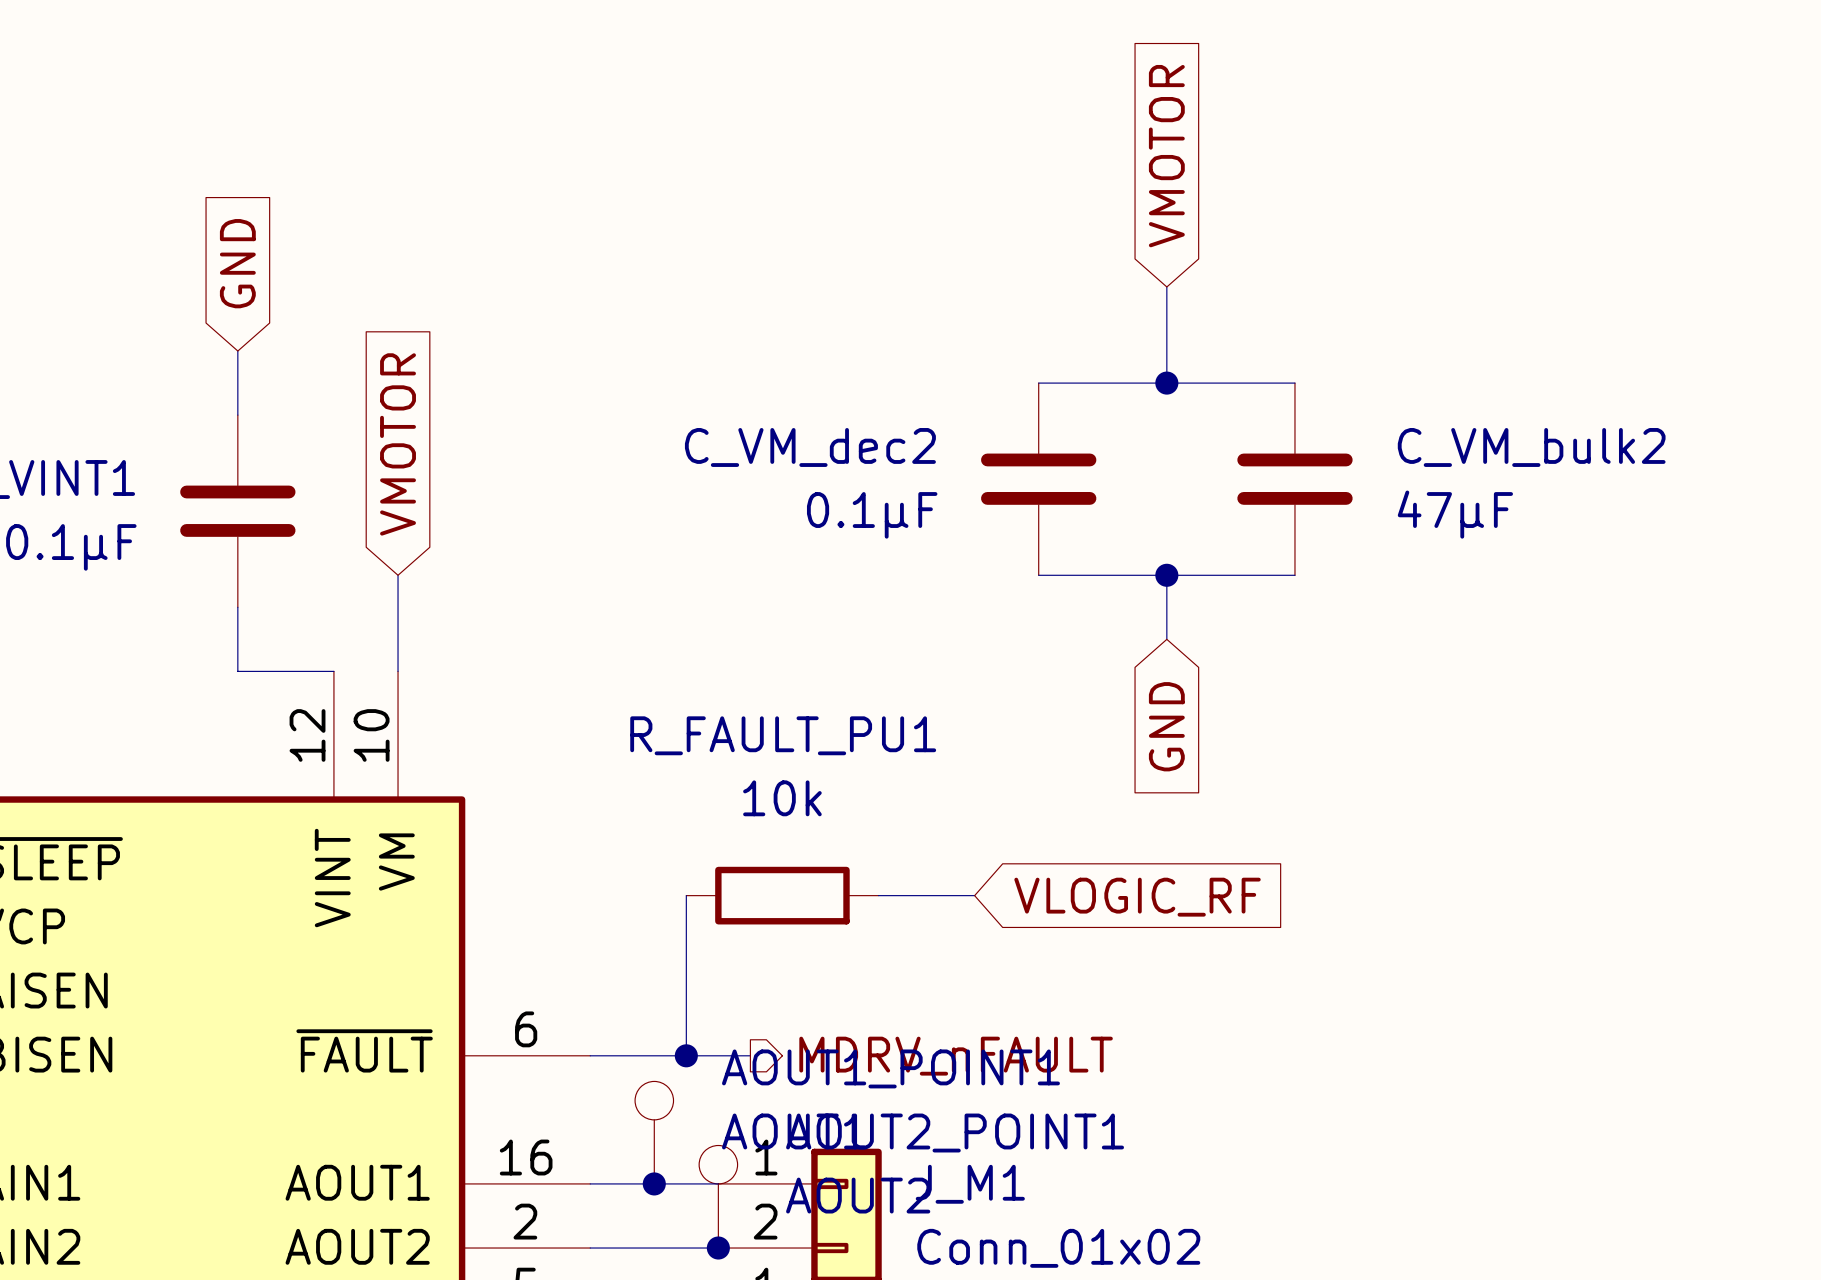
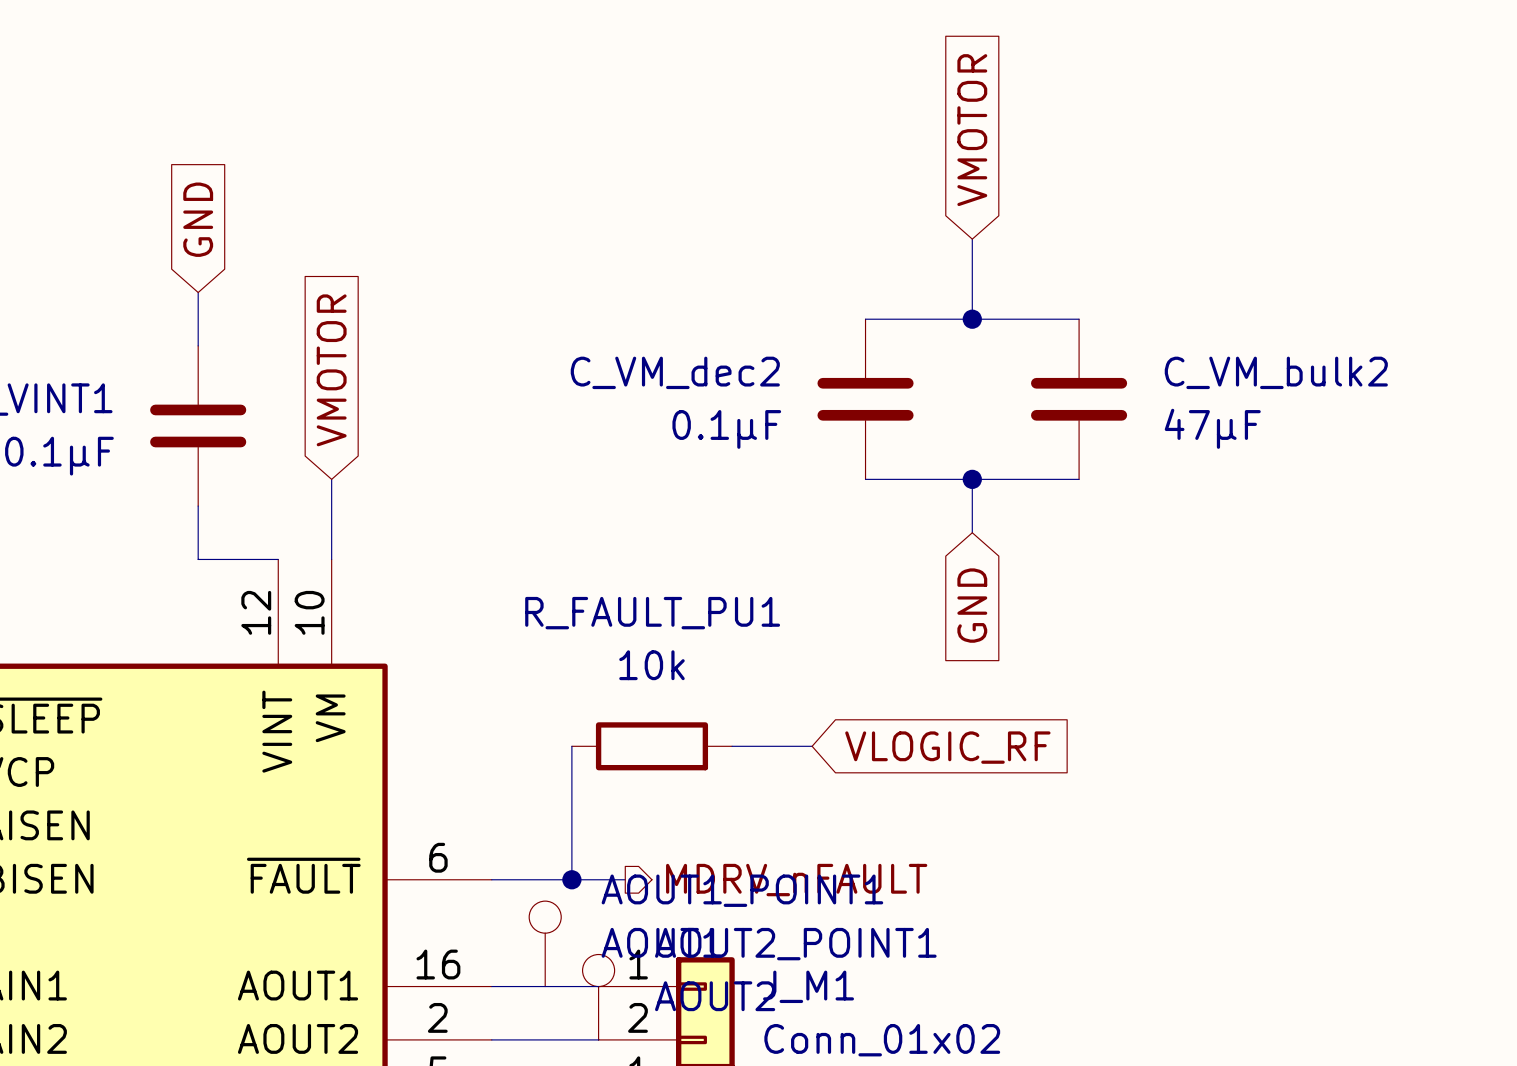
junction: (654, 1183) -> none
junction: (718, 1248) -> none

